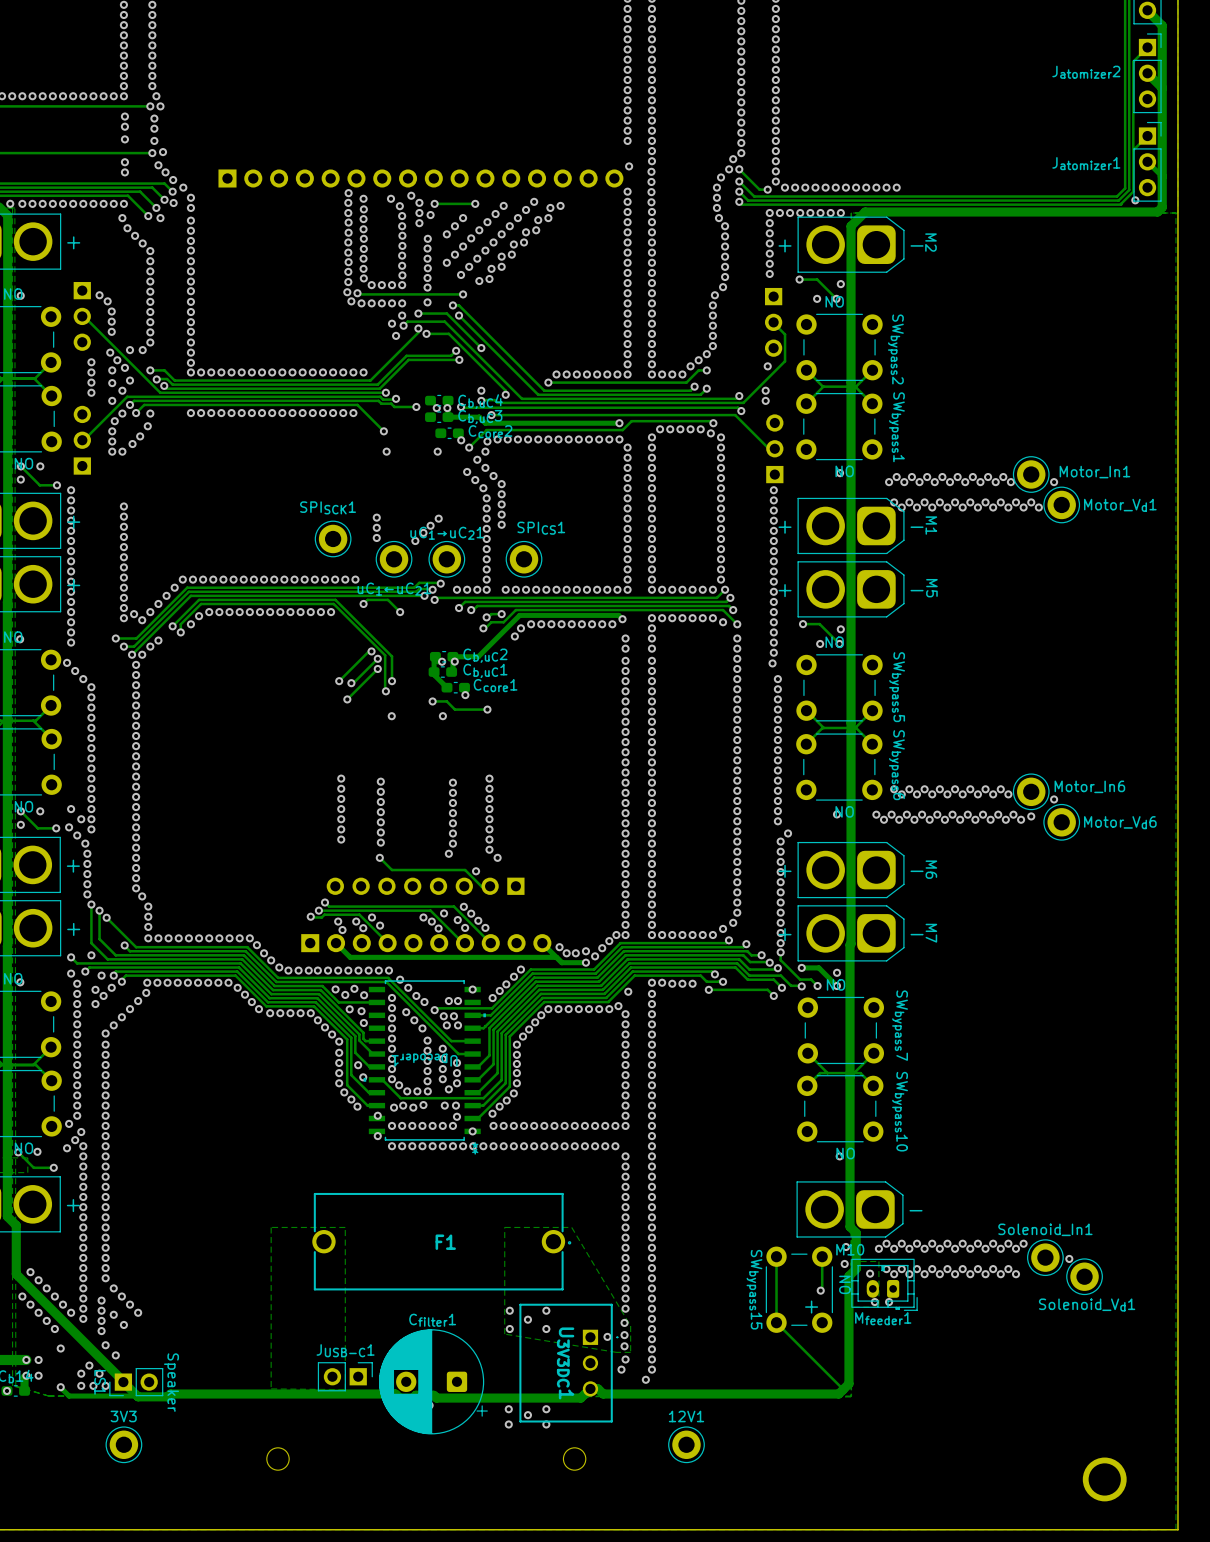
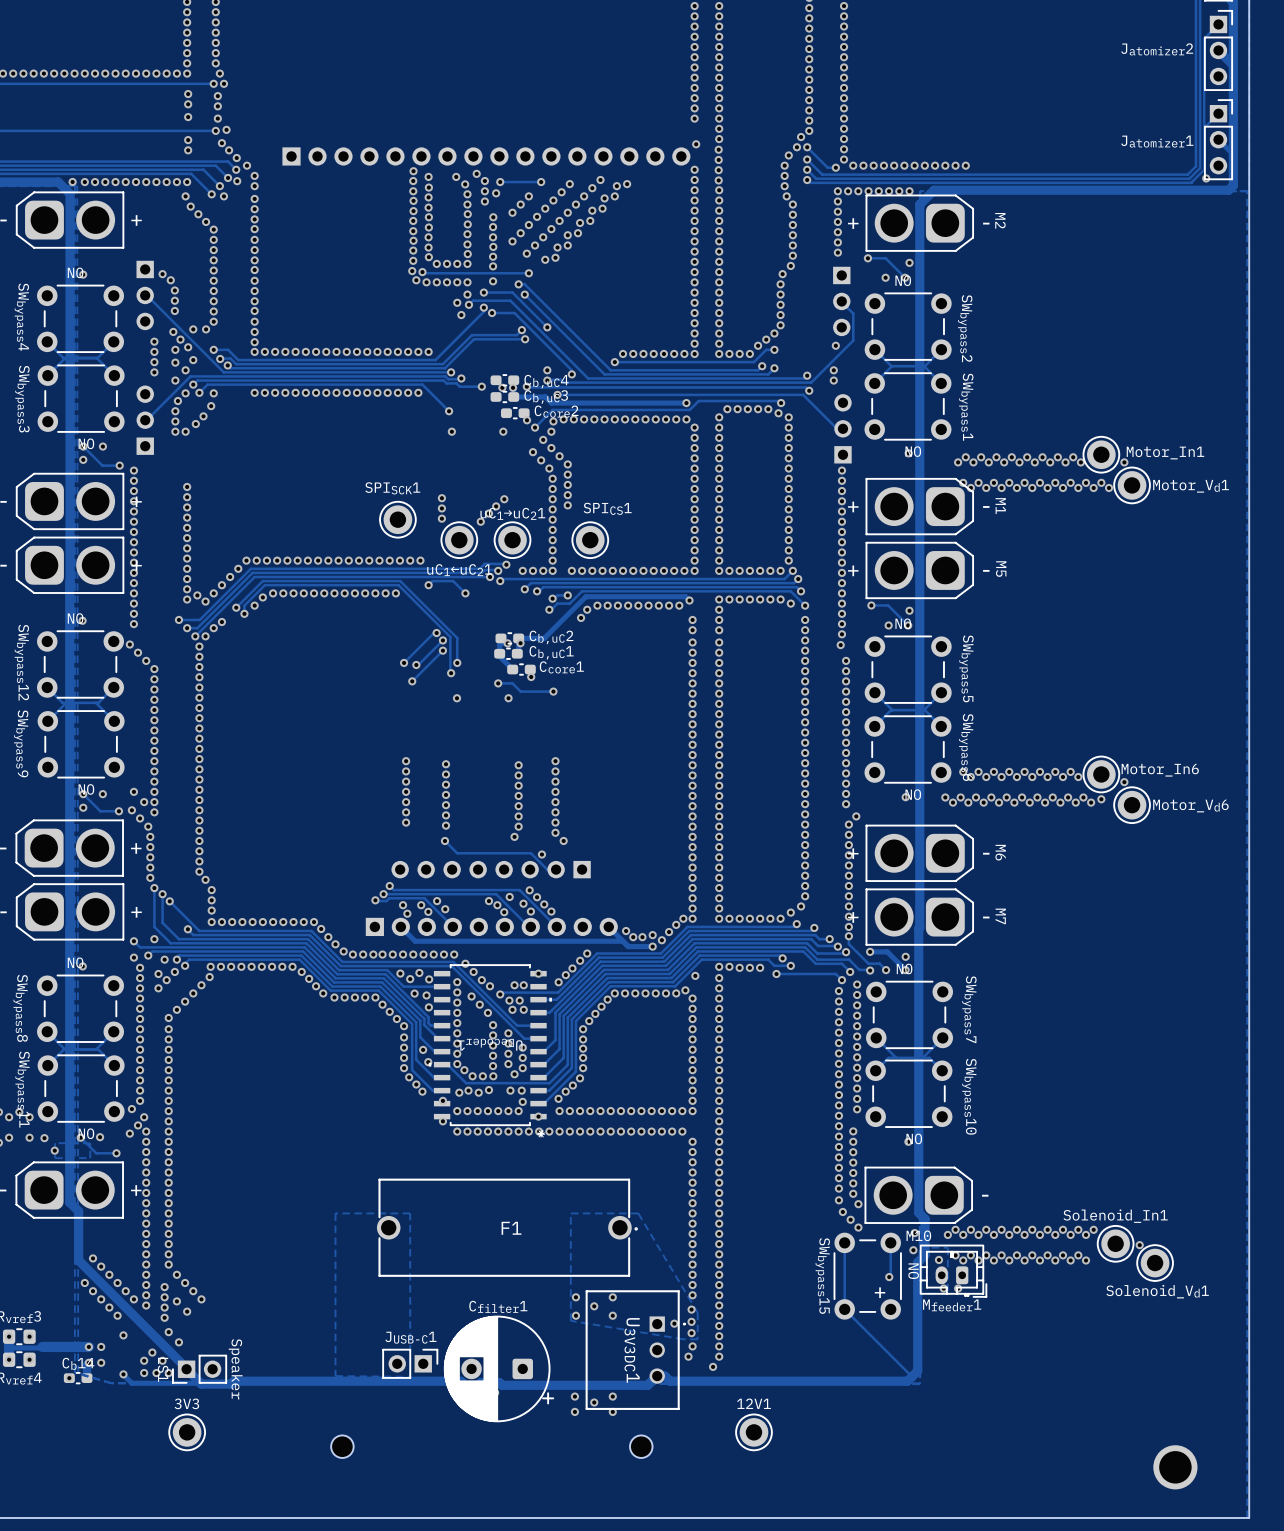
via: none -> (857, 984)
via: none -> (838, 991)
via: none -> (857, 994)
via: none -> (838, 1001)
via: none -> (857, 1005)
via: none -> (838, 1011)
via: none -> (857, 1015)
via: none -> (838, 1022)
via: none -> (857, 1026)
via: none -> (838, 1032)
via: none -> (857, 1036)
via: none -> (838, 1043)
via: none -> (857, 1046)
via: none -> (838, 1053)
via: none -> (857, 1057)
via: none -> (838, 1063)
via: none -> (857, 1067)
via: none -> (838, 1074)
via: none -> (857, 1078)
via: none -> (838, 1084)
via: none -> (857, 1088)
via: none -> (838, 1095)
via: none -> (857, 1098)
via: none -> (838, 1105)
via: none -> (857, 1109)
via: none -> (838, 1115)
via: none -> (838, 1126)
via: none -> (853, 1131)
via: none -> (838, 1136)
via: none -> (853, 1141)
via: none -> (838, 1147)
via: none -> (853, 1152)
via: none -> (838, 1157)
via: none -> (853, 1162)
via: none -> (838, 1167)
via: none -> (853, 1172)
via: none -> (838, 1178)
via: none -> (853, 1183)
via: none -> (838, 1188)
via: none -> (853, 1193)
via: none -> (838, 1200)
via: none -> (858, 1204)
via: none -> (842, 1211)
via: none -> (850, 1219)
via: none -> (858, 1227)

